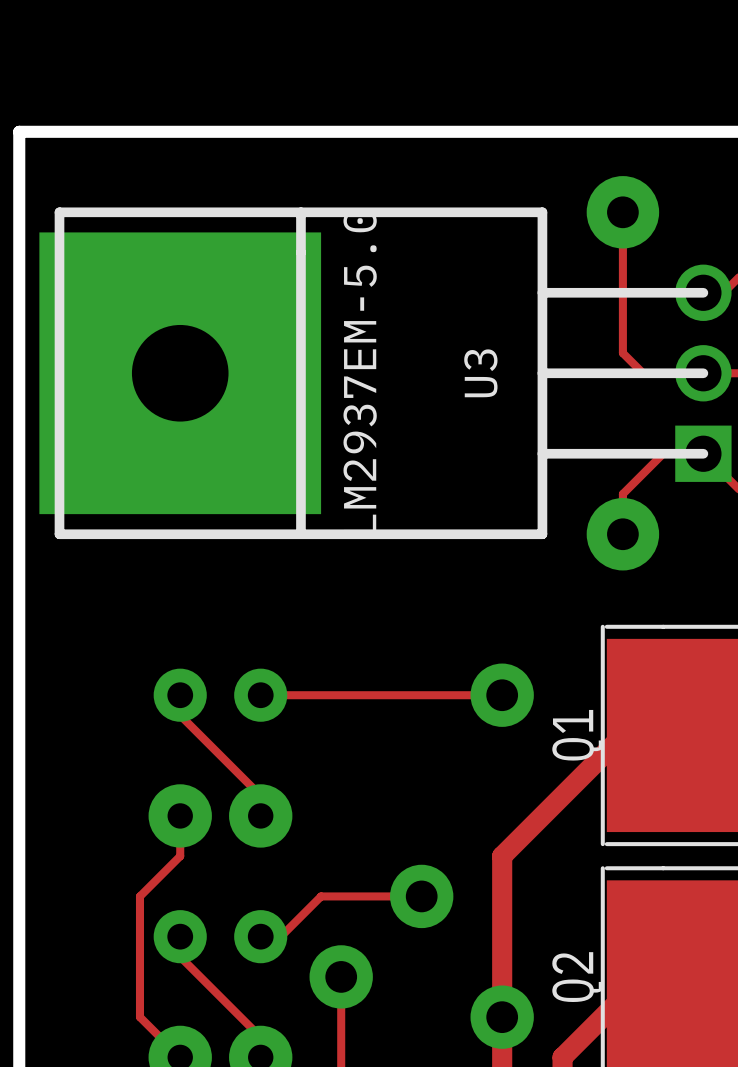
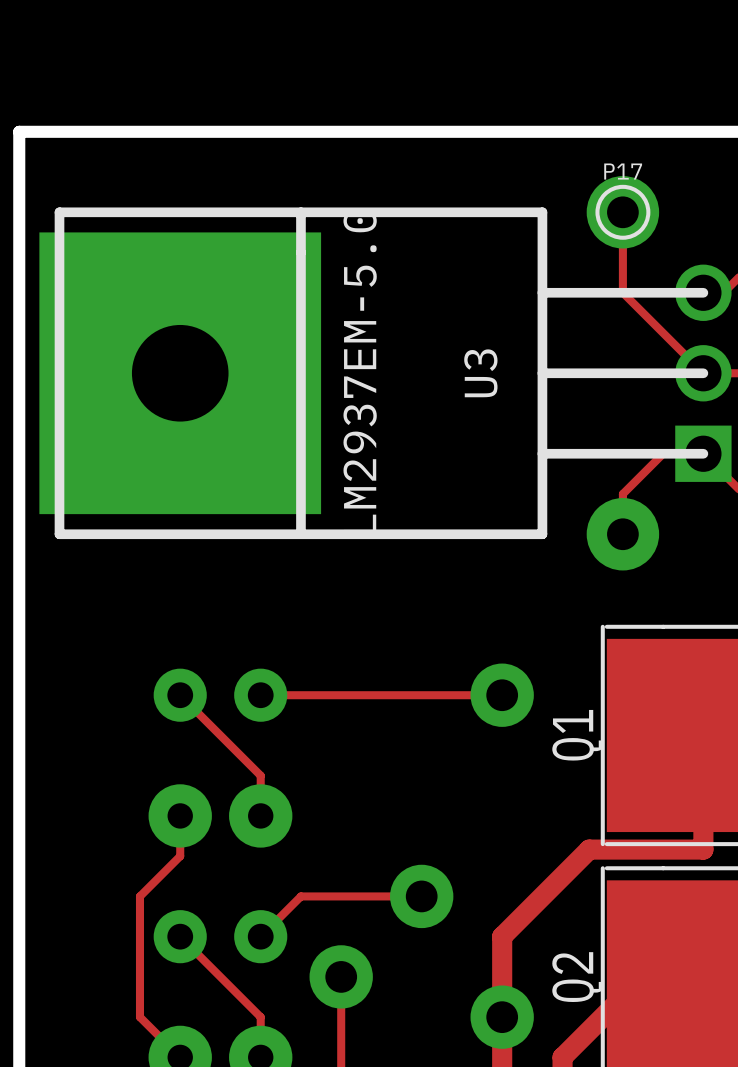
P17 side: bottom (622, 212) -> top (622, 212)
track: (622, 292) (622, 353) (643, 373) (703, 373) -> (622, 292) (703, 373)
track: (180, 695) (180, 715) (260, 795) -> (180, 695) (260, 775) (260, 795)
track: (703, 735) (622, 735) (502, 856) (502, 936) -> (703, 735) (703, 849) (589, 849) (502, 936)
track: (321, 896) (280, 936) (260, 936) -> (321, 896) (300, 896) (260, 936)
track: (180, 936) (180, 956) (260, 1037) -> (180, 936) (260, 1017) (260, 1037)

